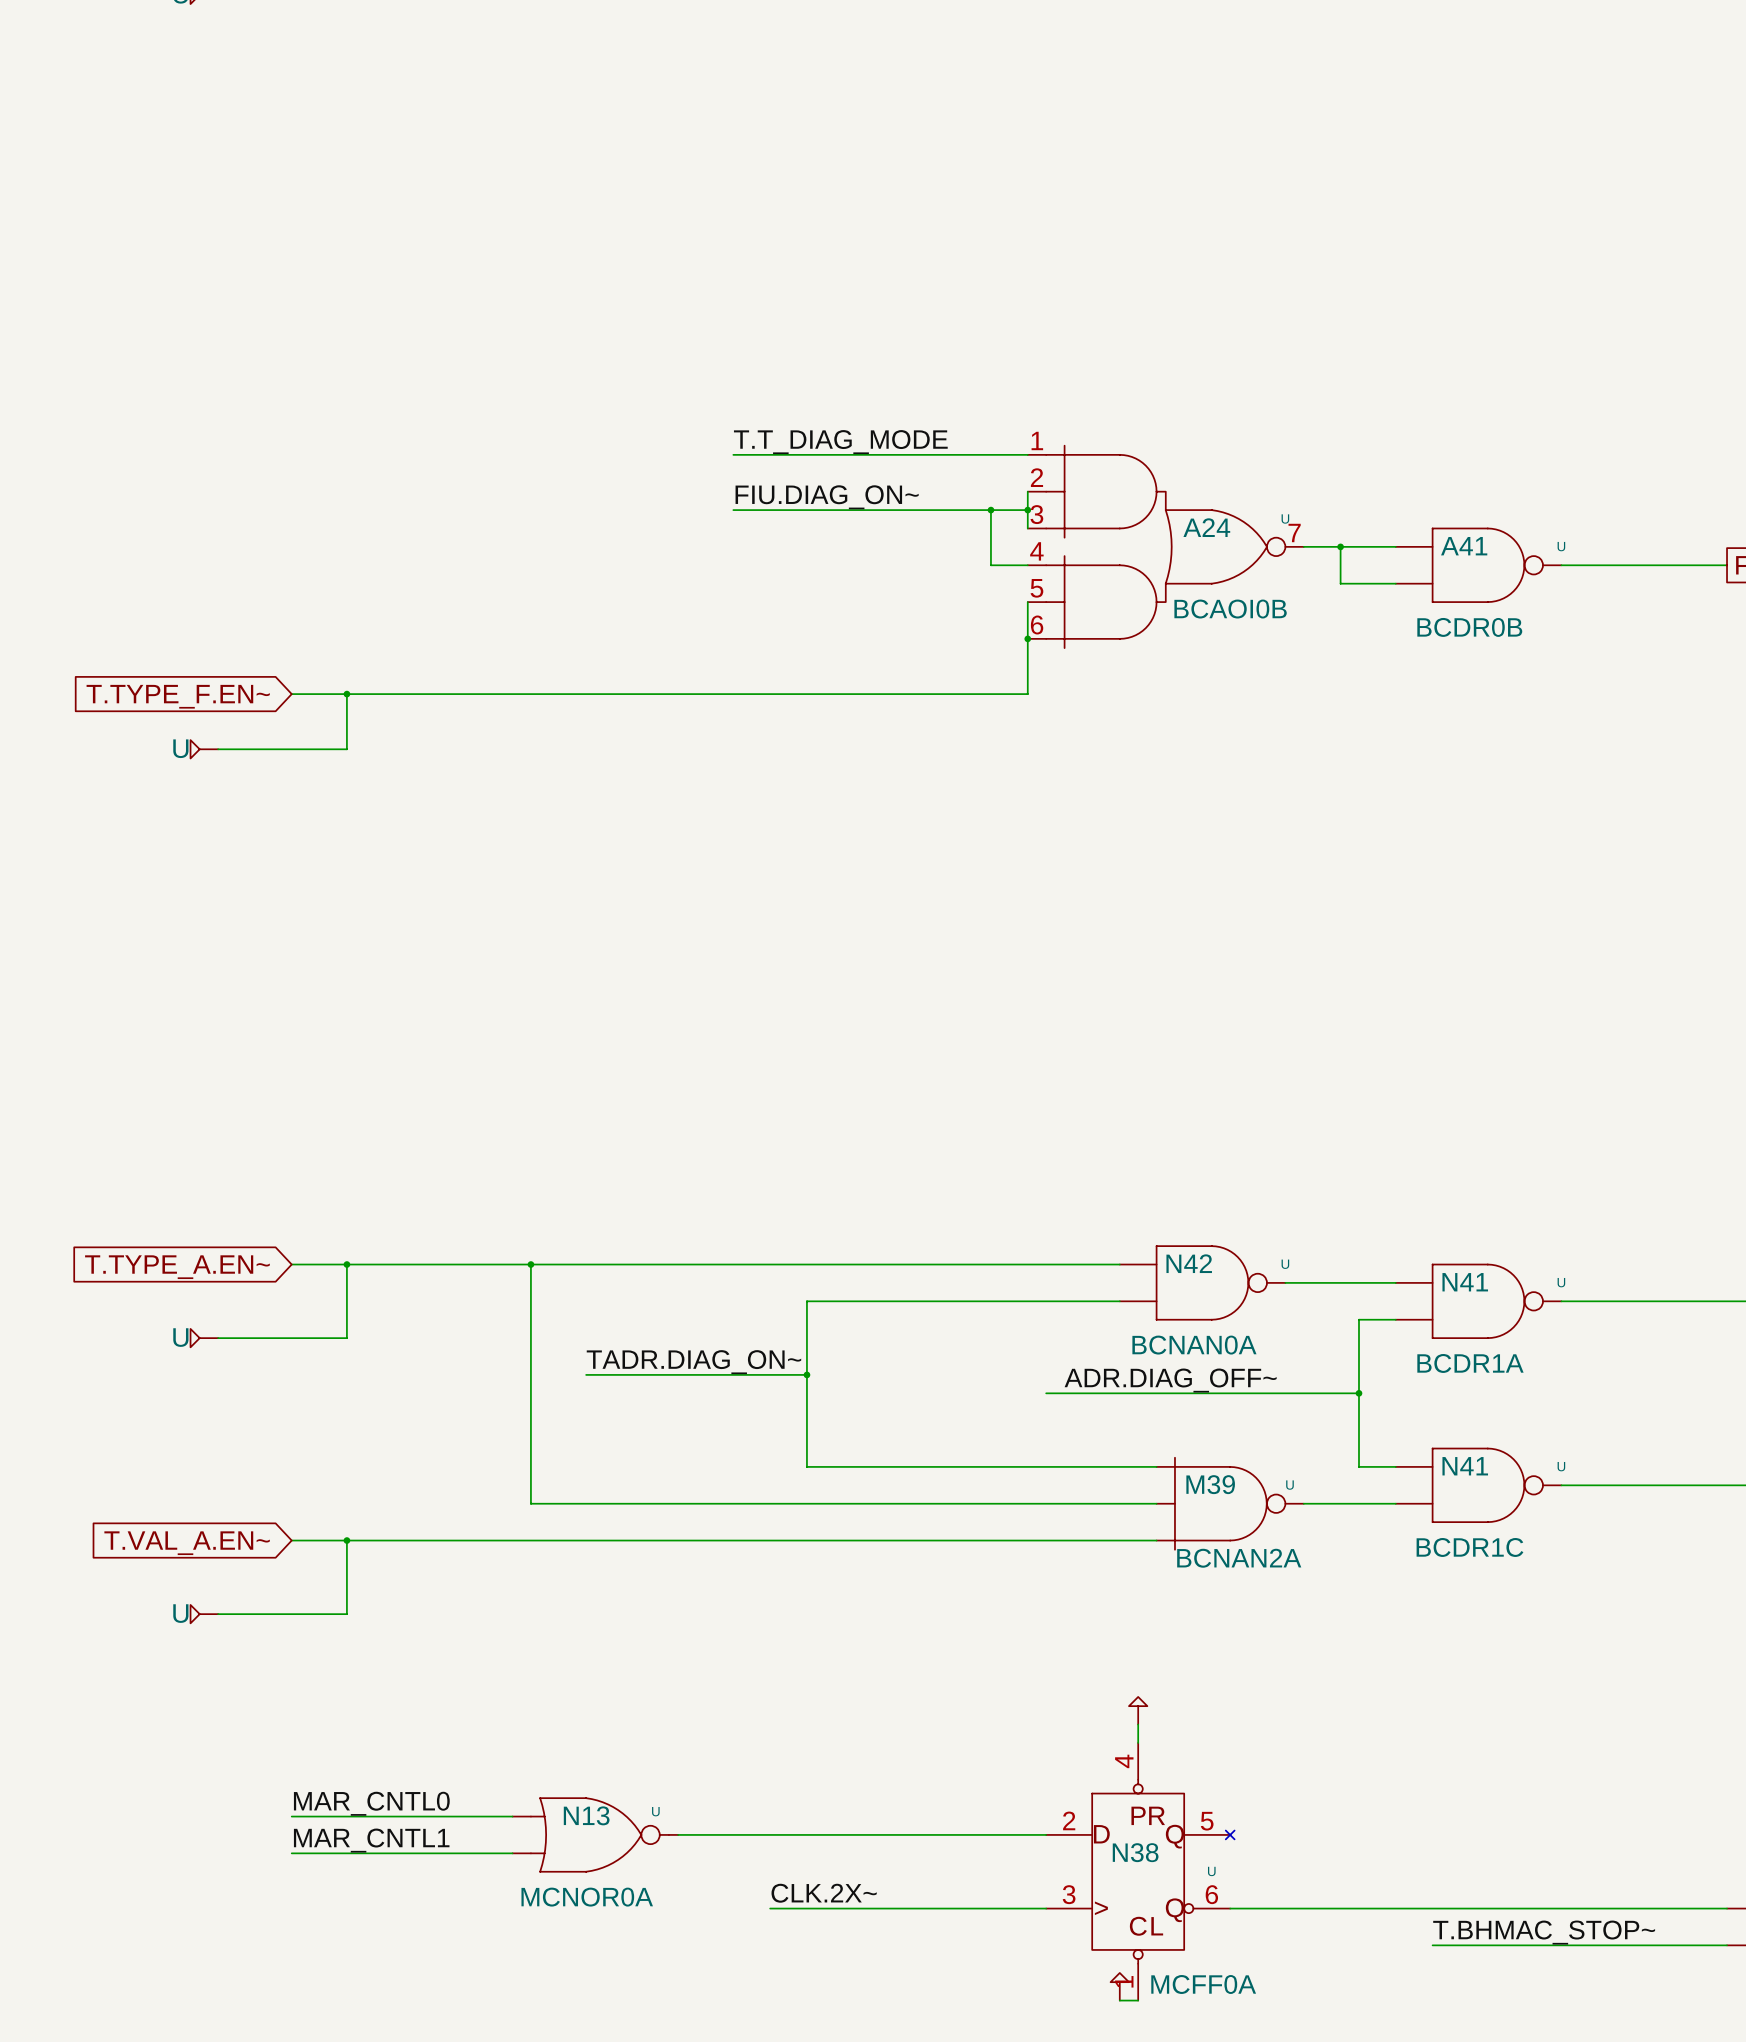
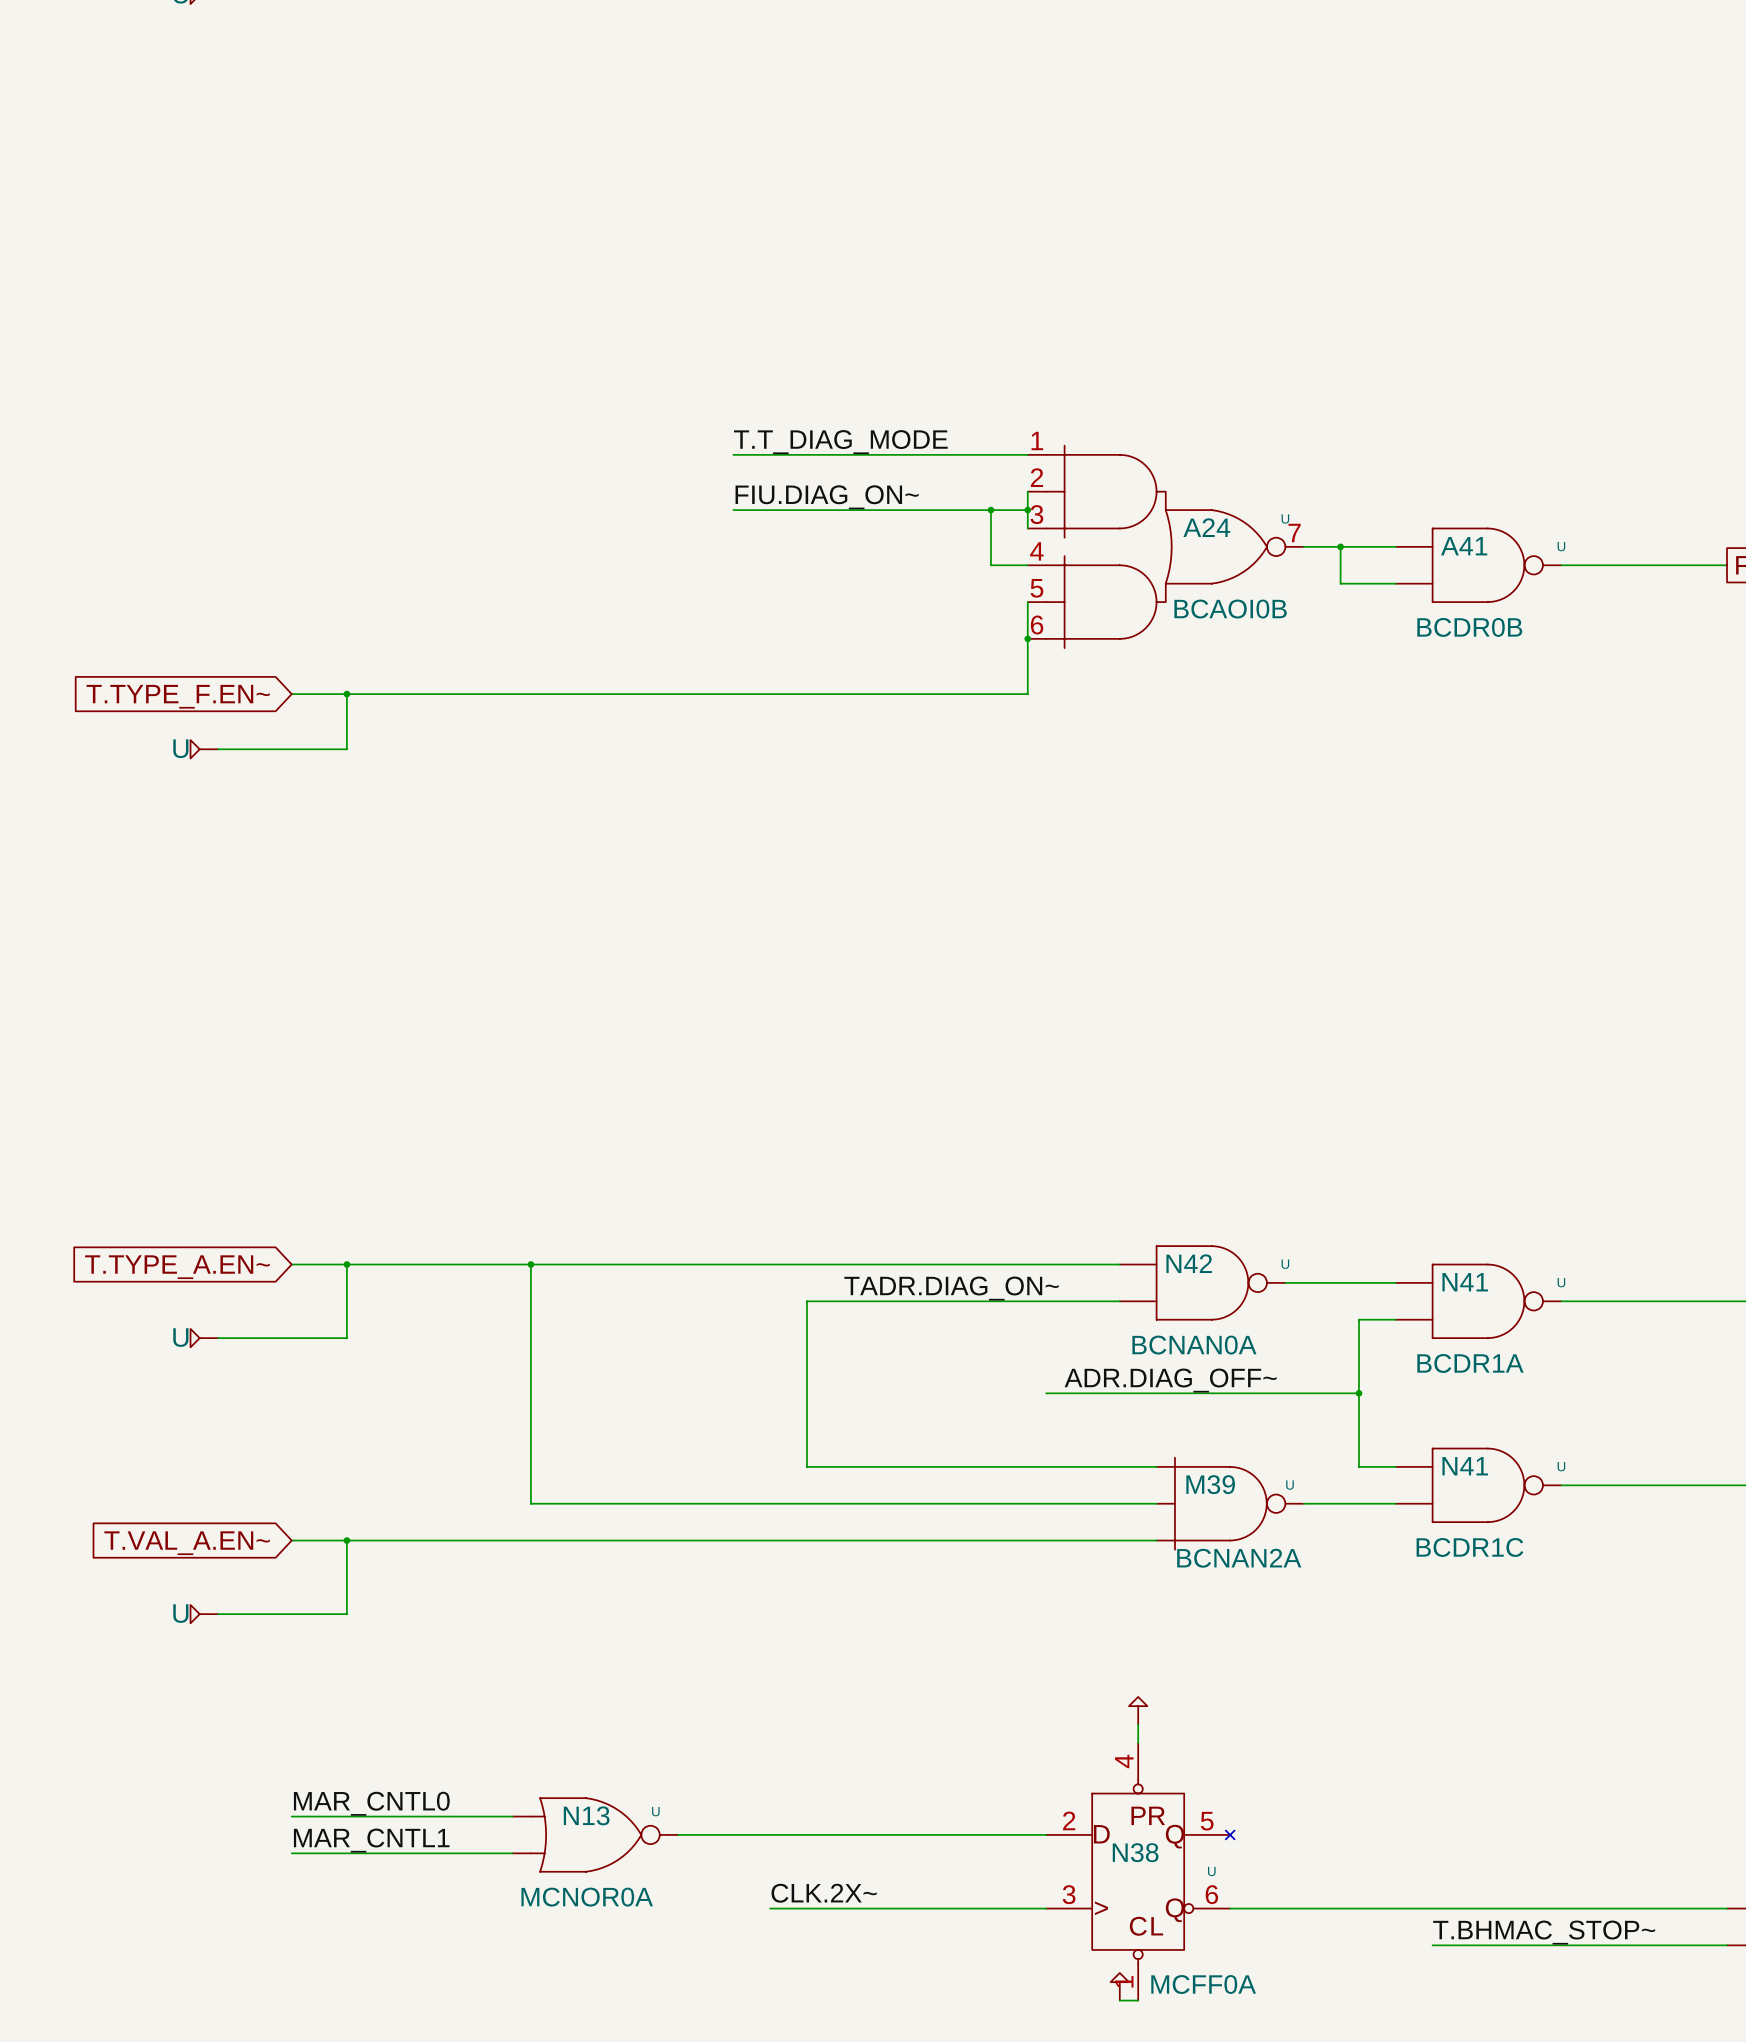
label: none -> TADR.DIAG_ON~ (951, 1288)
label: TADR.DIAG_ON~ (693, 1362) -> none
wire: (586, 1374) (806, 1374) -> none
junction: (806, 1374) -> none

